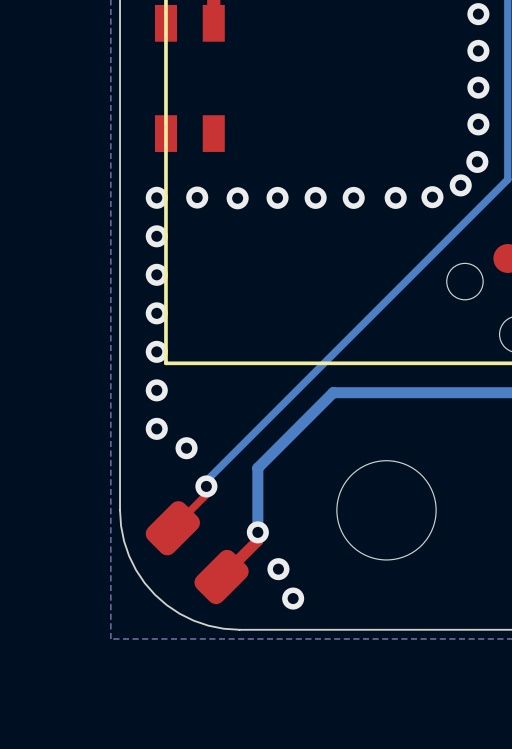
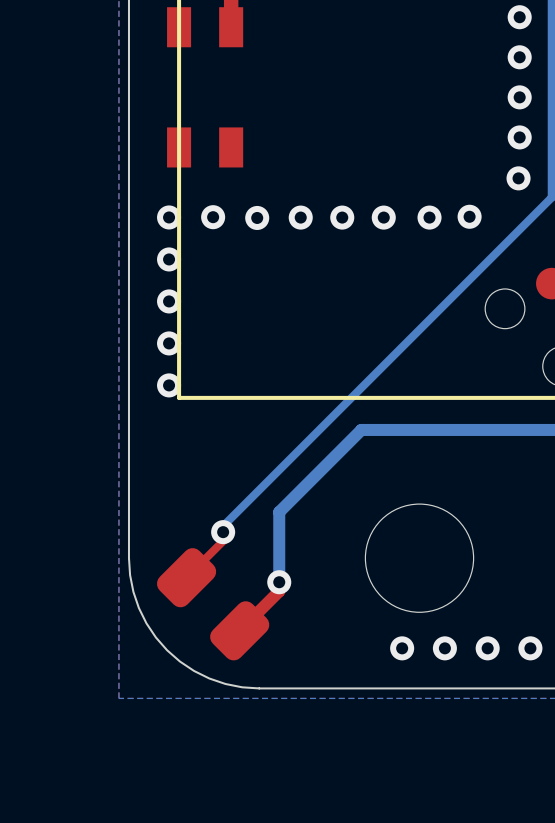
via: (460, 185) -> none
via: (156, 390) -> none
via: (156, 428) -> none
via: (186, 448) -> none
via: (278, 569) -> none
via: none -> (402, 648)
via: none -> (444, 648)
via: none -> (487, 648)
via: none -> (530, 648)
via: (293, 598) -> none

